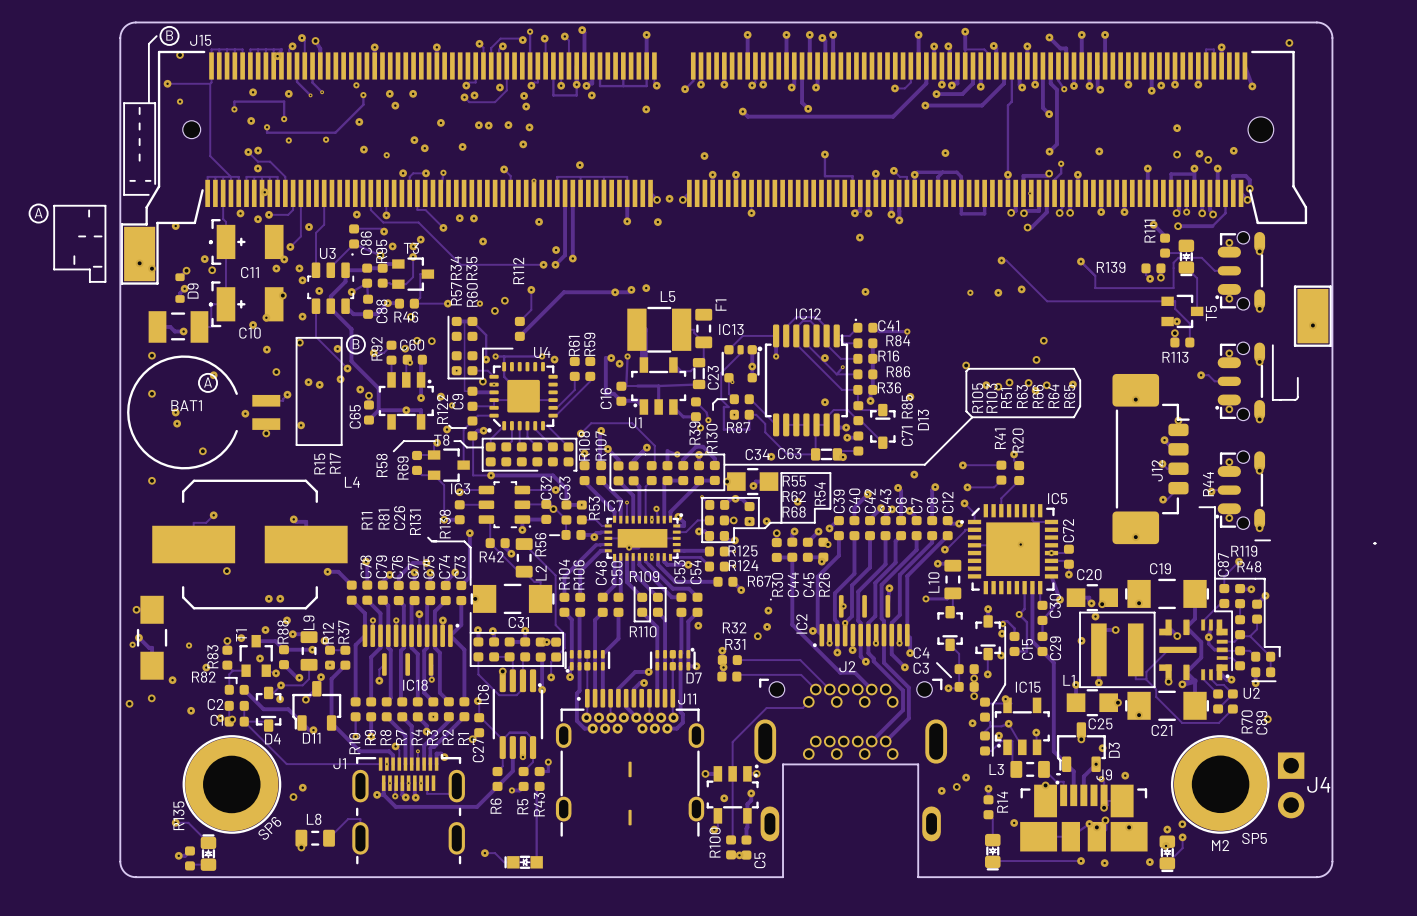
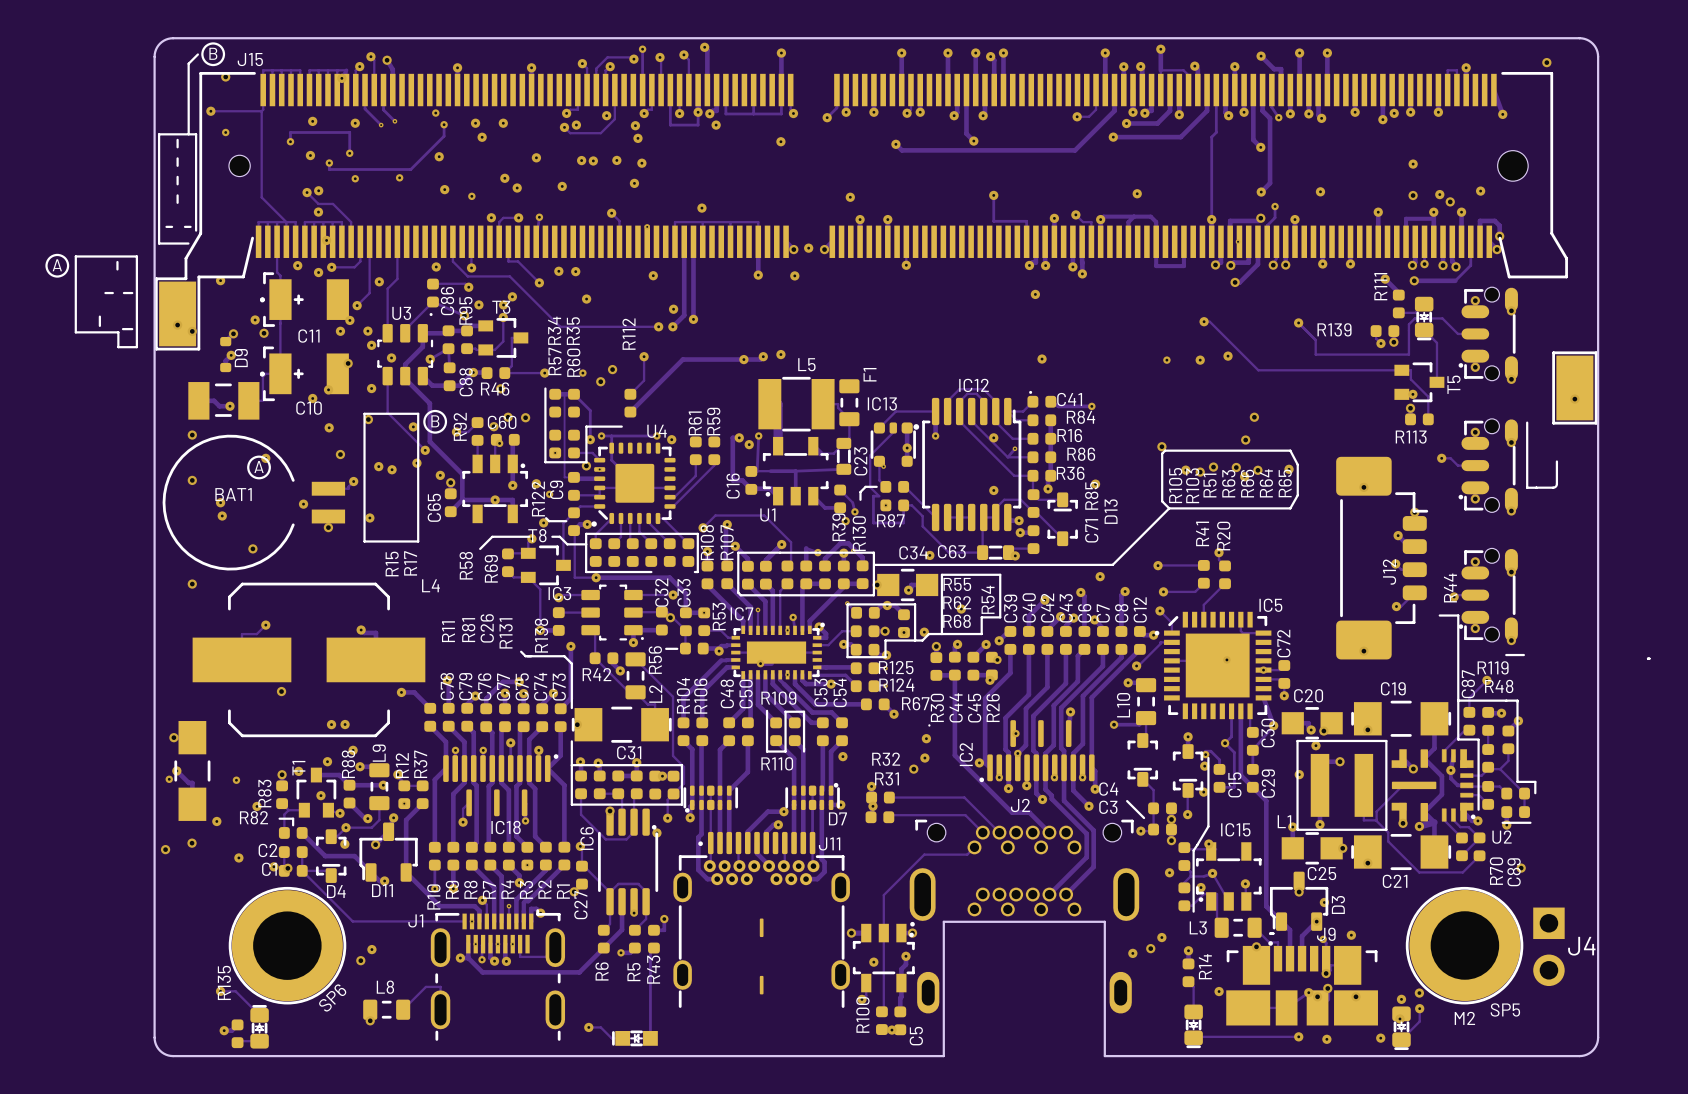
track: (540, 656) (542, 690) -> none

